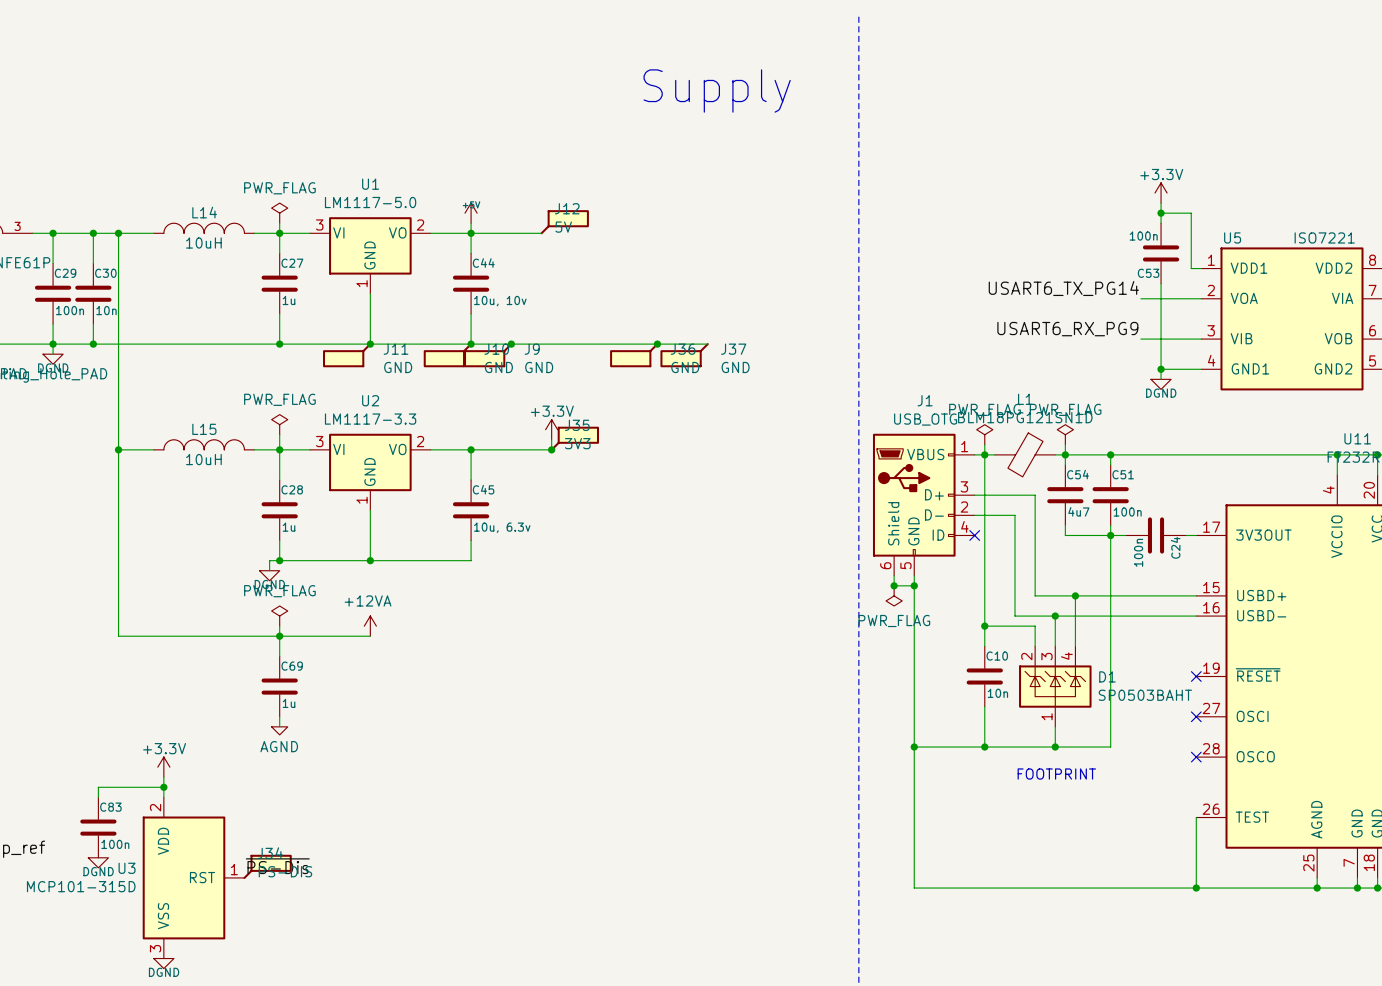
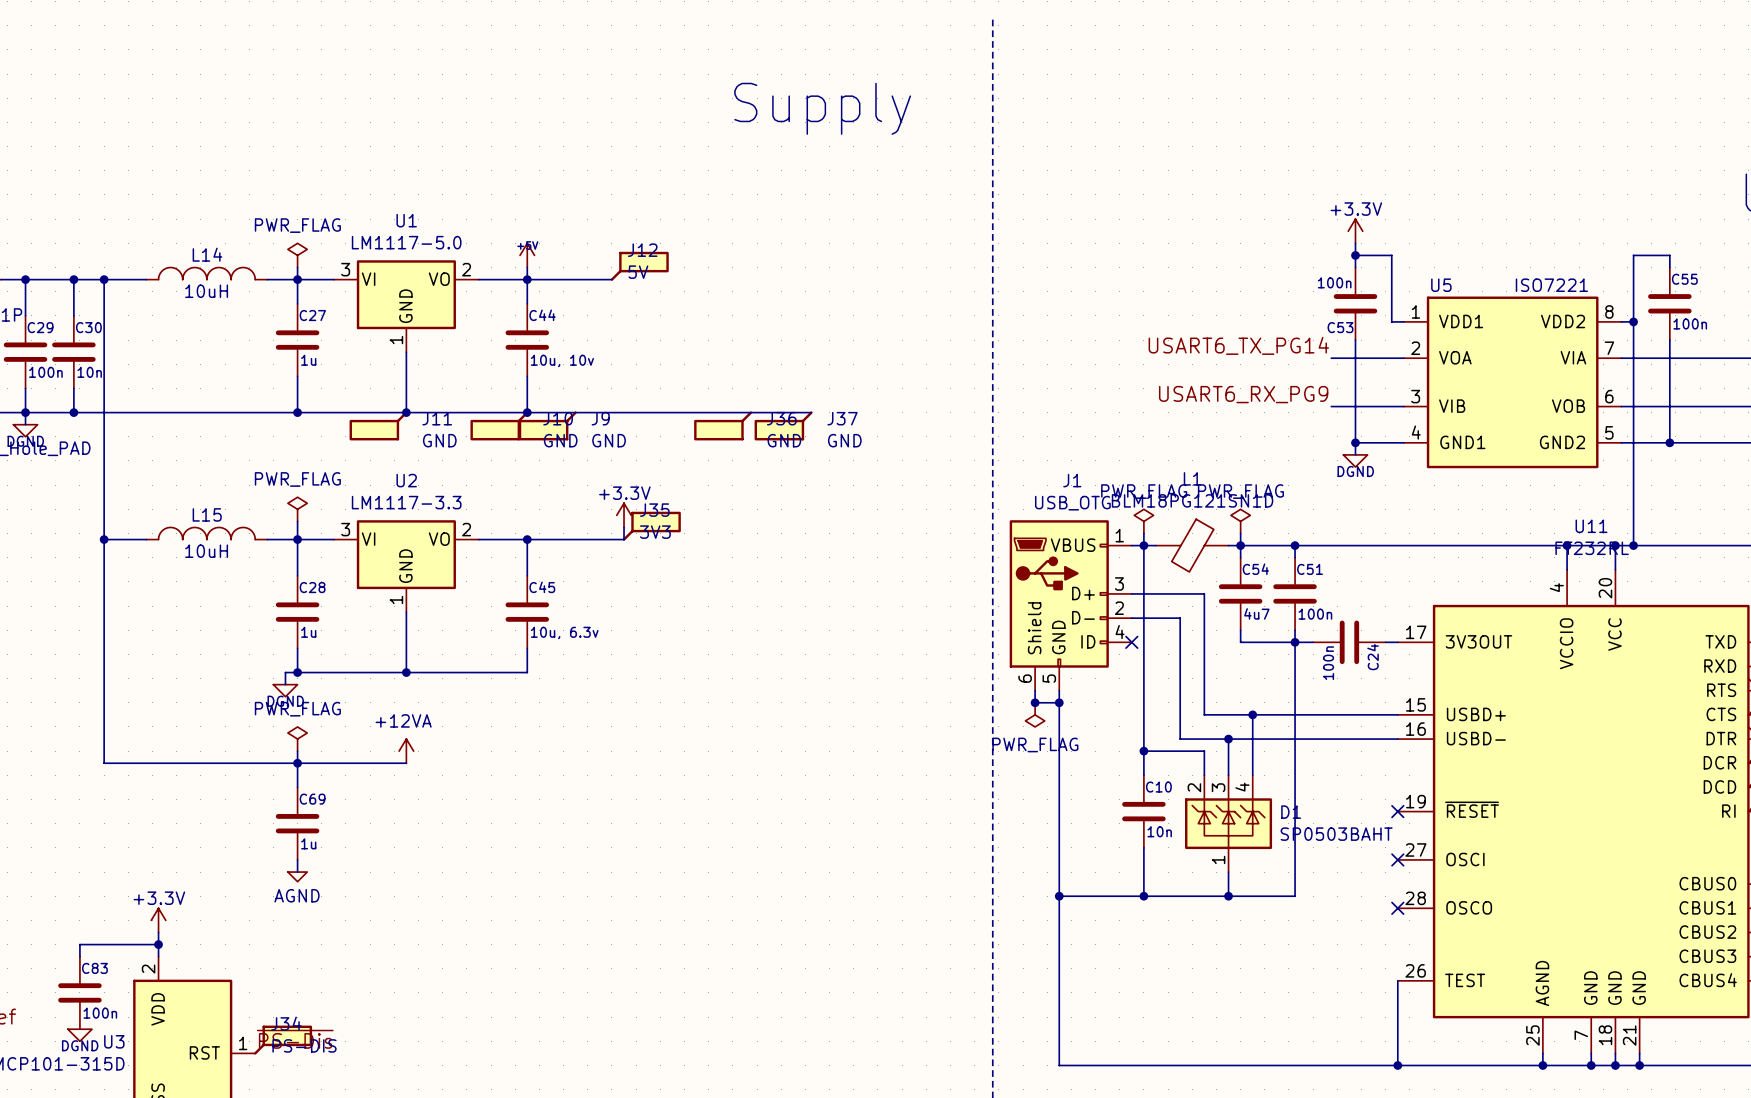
junction: (511, 344) -> none
junction: (657, 344) -> none
junction: (551, 449) -> none
text: FOOTPRINT (1056, 774) -> none

